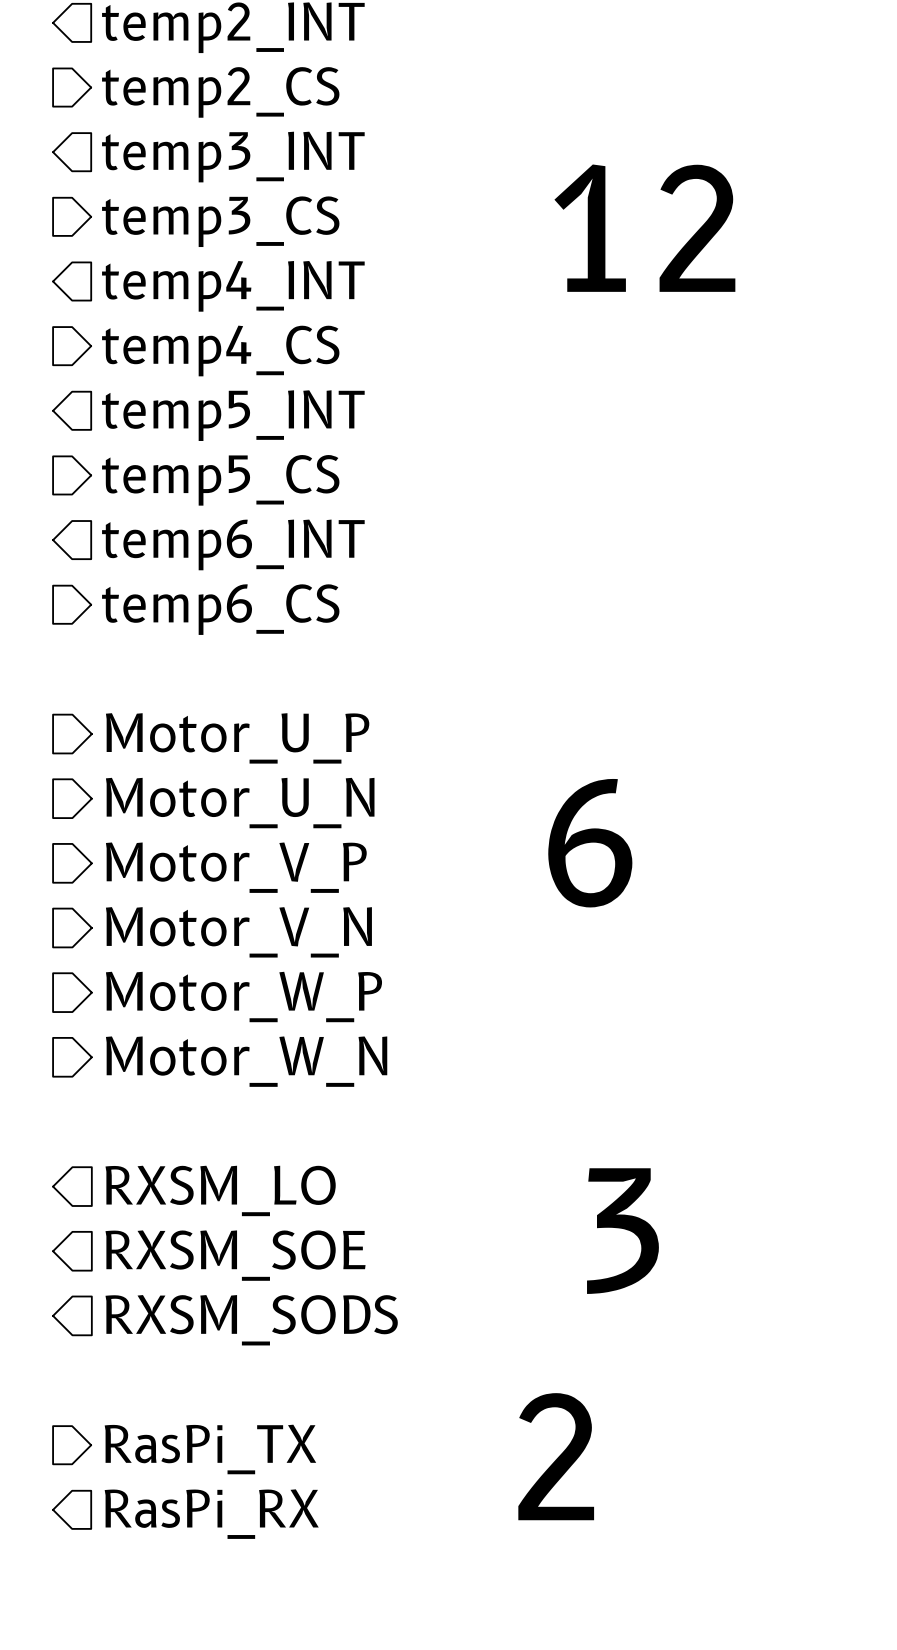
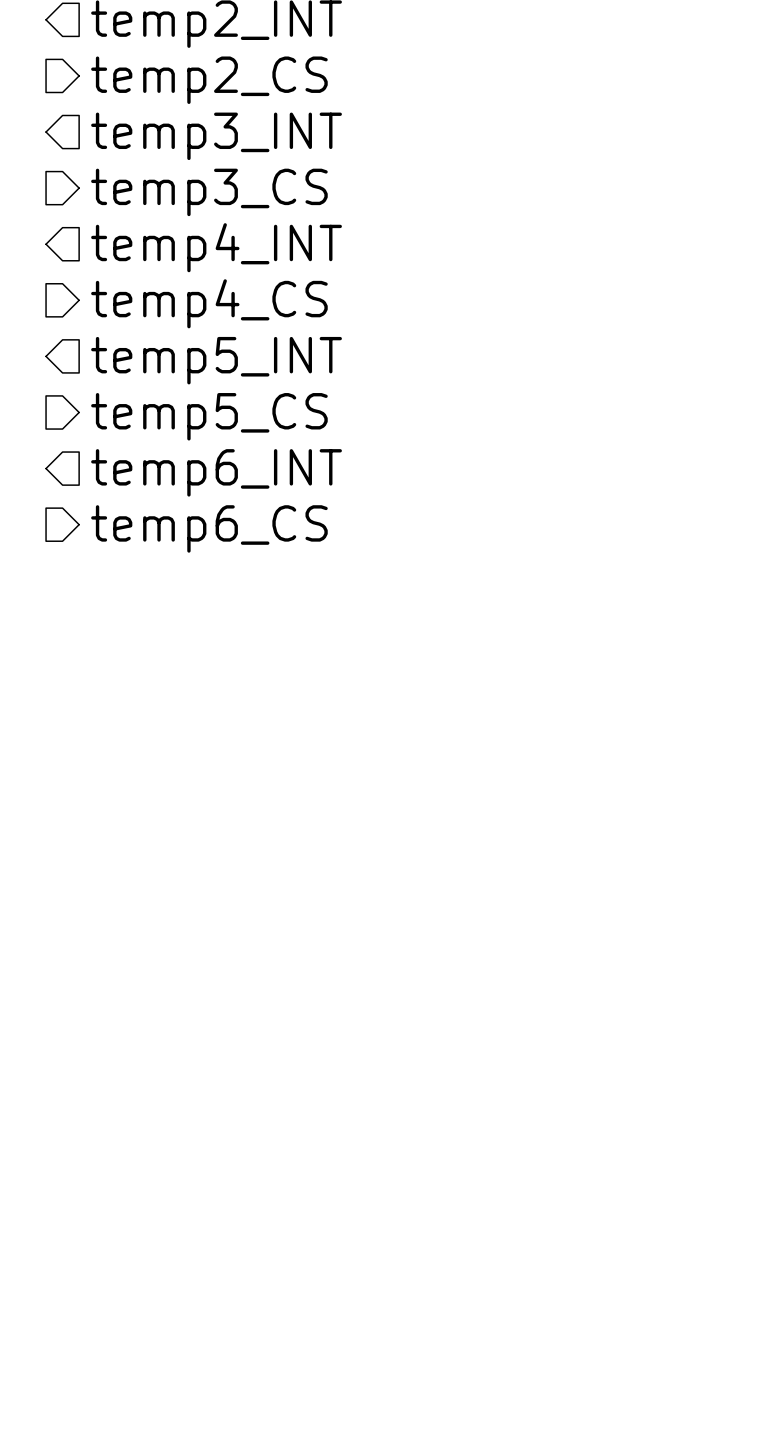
text: 12 (644, 228) -> none
hierarchical label: Motor_U_P (237, 738) -> none
hierarchical label: Motor_U_N (240, 803) -> none
text: 6 (590, 843) -> none
hierarchical label: Motor_V_P (236, 867) -> none
hierarchical label: Motor_V_N (238, 932) -> none
hierarchical label: Motor_W_P (243, 997) -> none
hierarchical label: Motor_W_N (246, 1061) -> none
hierarchical label: RXSM_LO (220, 1190) -> none
text: 3 (622, 1231) -> none
hierarchical label: RXSM_SOE (235, 1255) -> none
hierarchical label: RXSM_SODS (251, 1320) -> none
hierarchical label: RasPi_TX (210, 1449) -> none
text: 2 (556, 1456) -> none
hierarchical label: RasPi_RX (211, 1514) -> none

